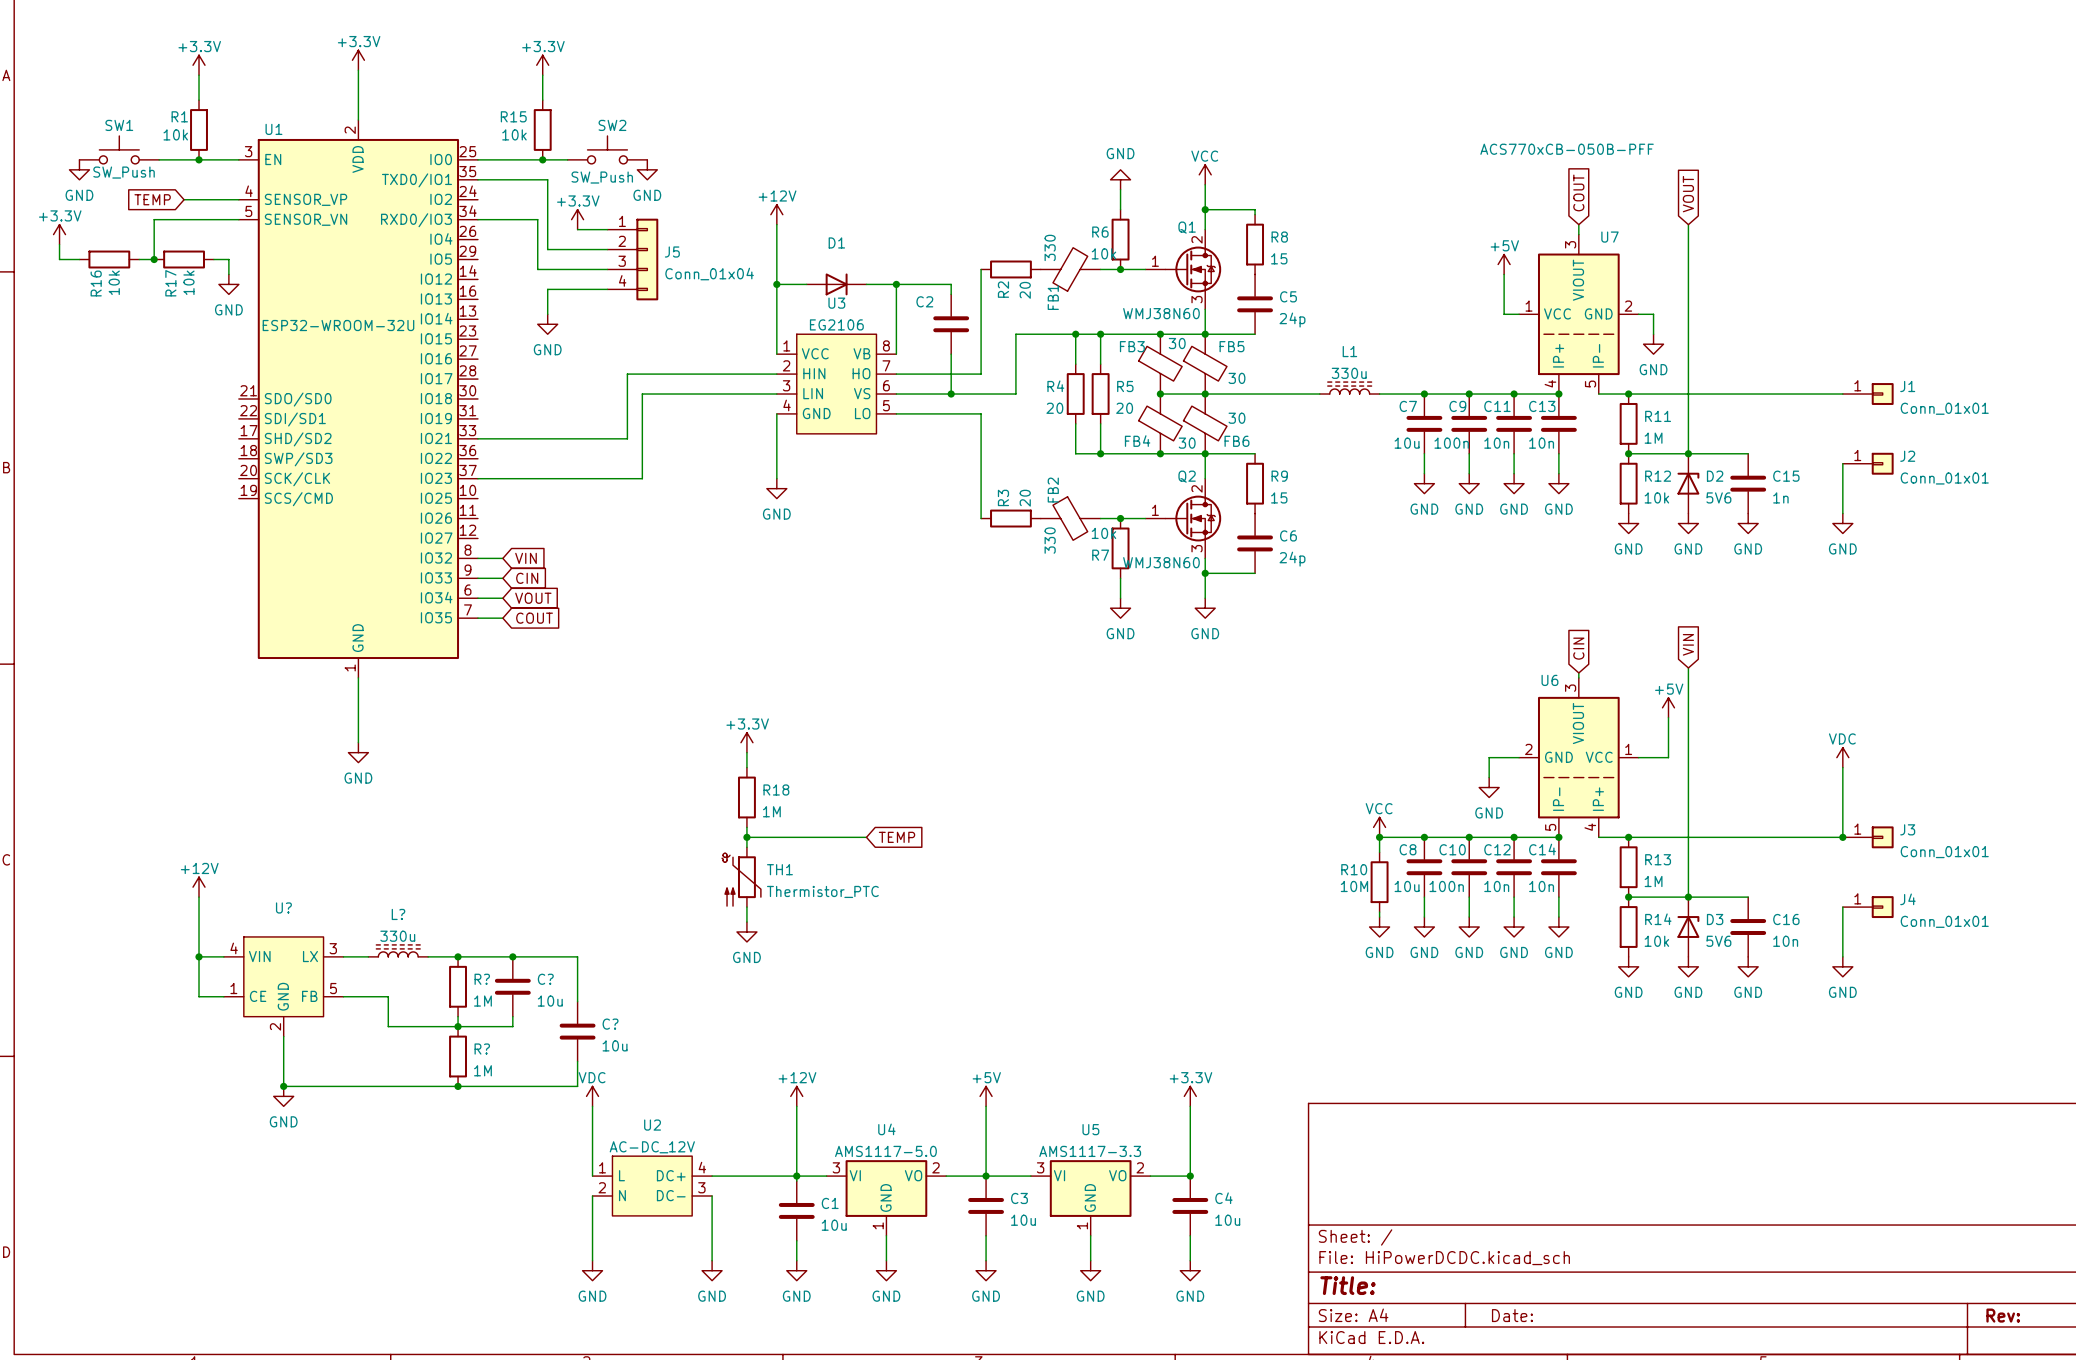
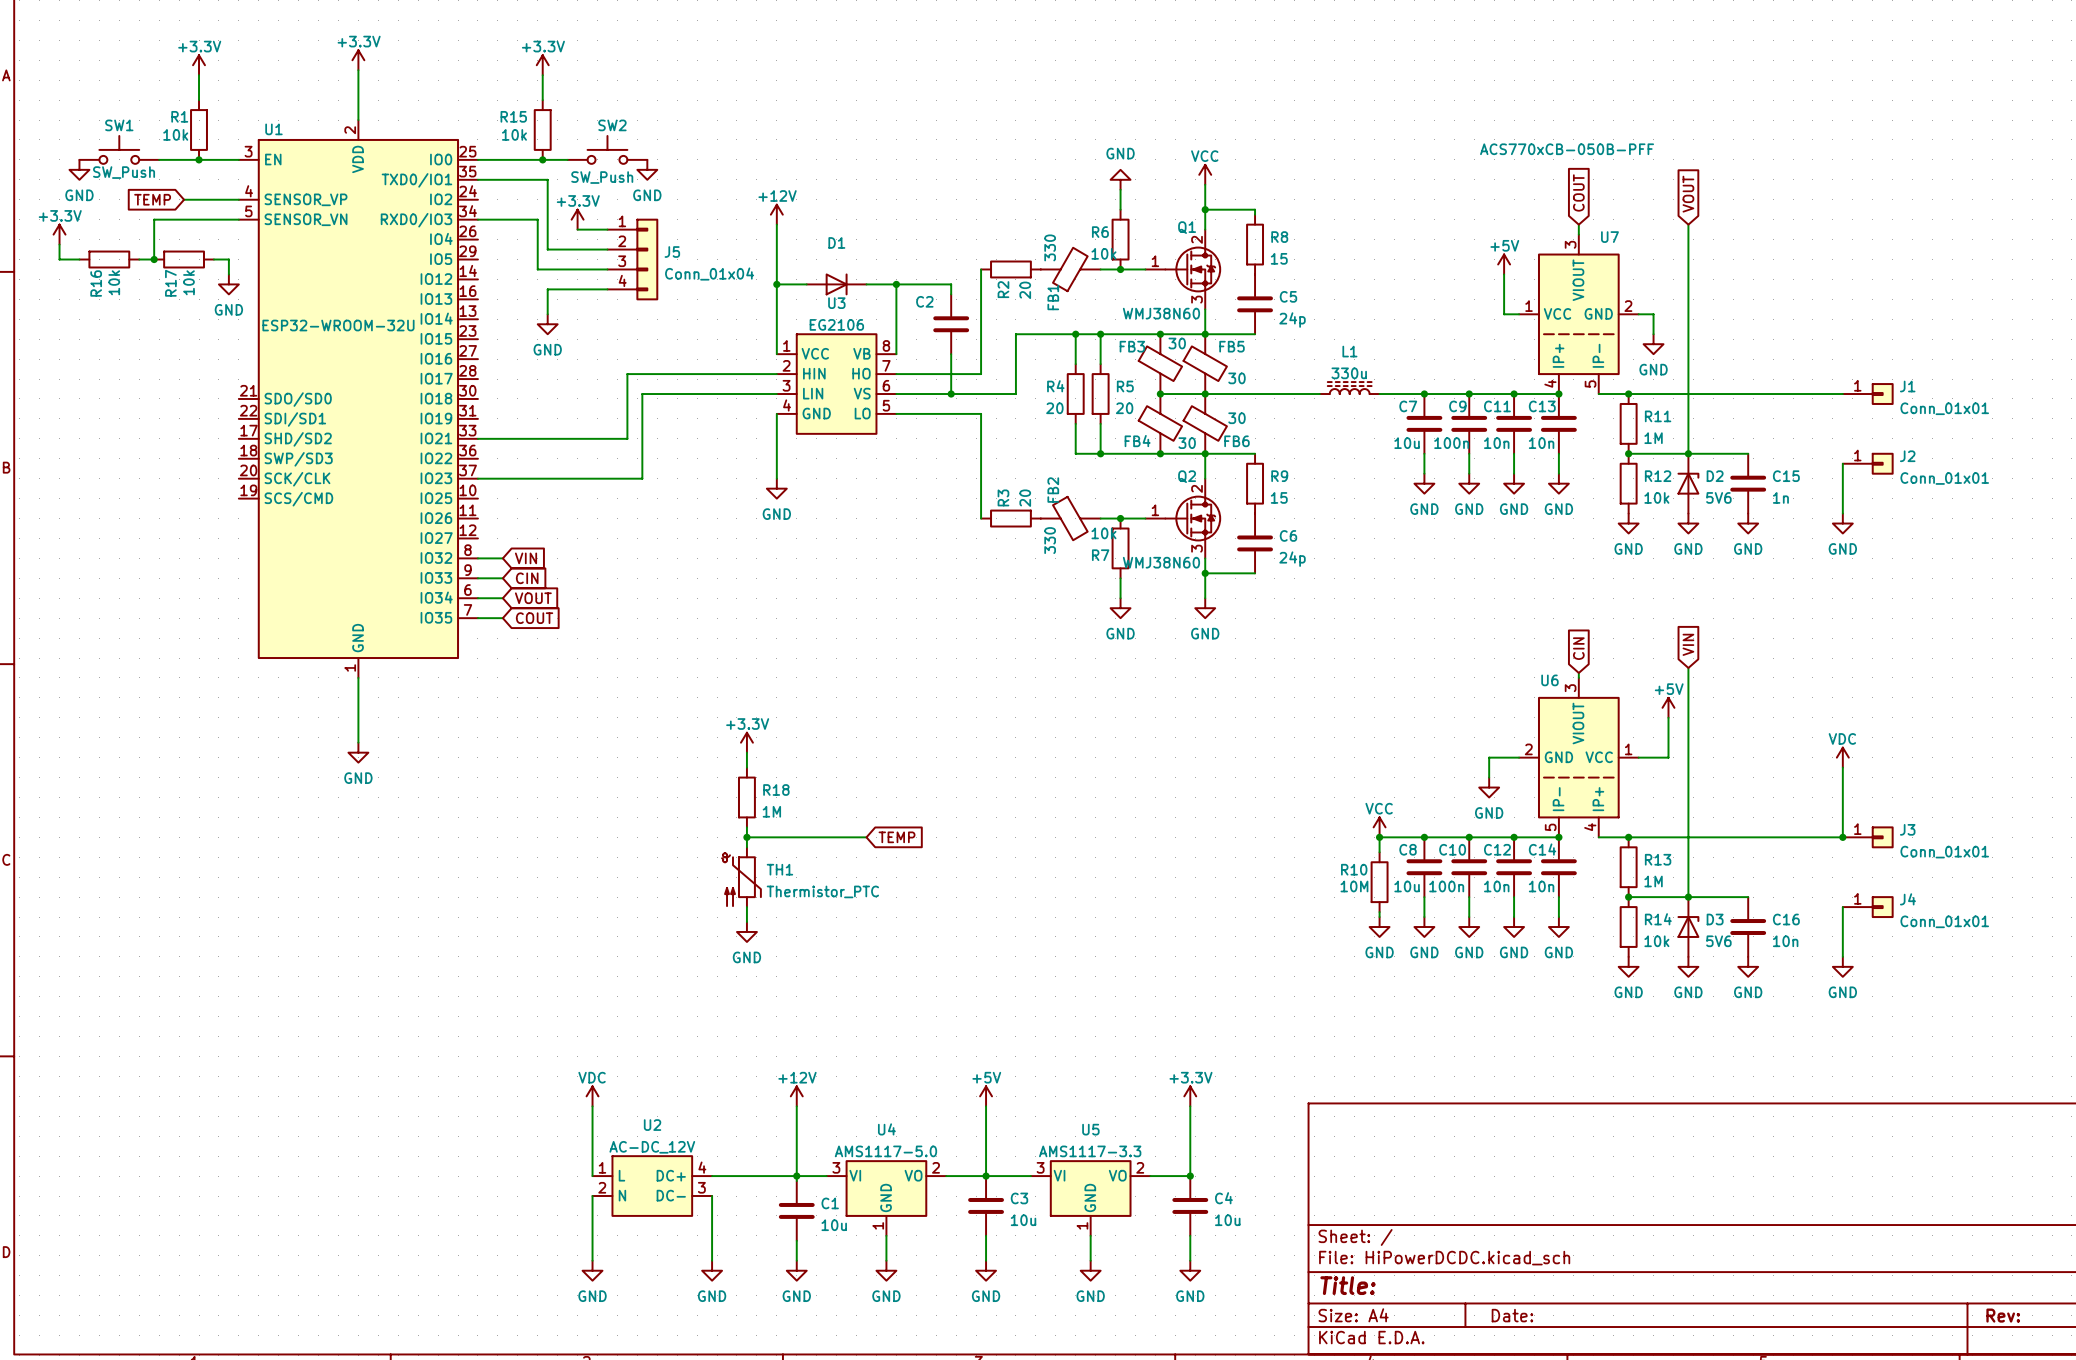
power symbol: +12V (199, 887) -> none
wire: (199, 897) (199, 996) (223, 996) -> none
L?: 330u (398, 950) -> none
wire: (199, 956) (223, 956) -> none
junction: (199, 956) -> none
wire: (343, 956) (368, 956) -> none
wire: (428, 956) (577, 956) (577, 1001) -> none
junction: (458, 956) -> none
junction: (512, 956) -> none
U?: (283, 986) -> none
R?: 1M (458, 986) -> none
C?: 10u (512, 986) -> none
wire: (343, 996) (388, 996) (388, 1026) (512, 1026) (512, 1016) -> none
wire: (458, 1016) (458, 1026) -> none
junction: (458, 1026) -> none
C?: 10u (577, 1031) -> none
wire: (283, 1036) (283, 1086) (577, 1086) (577, 1061) -> none
R?: 1M (458, 1056) -> none
junction: (283, 1086) -> none
junction: (458, 1086) -> none
power symbol: GND (283, 1096) -> none

